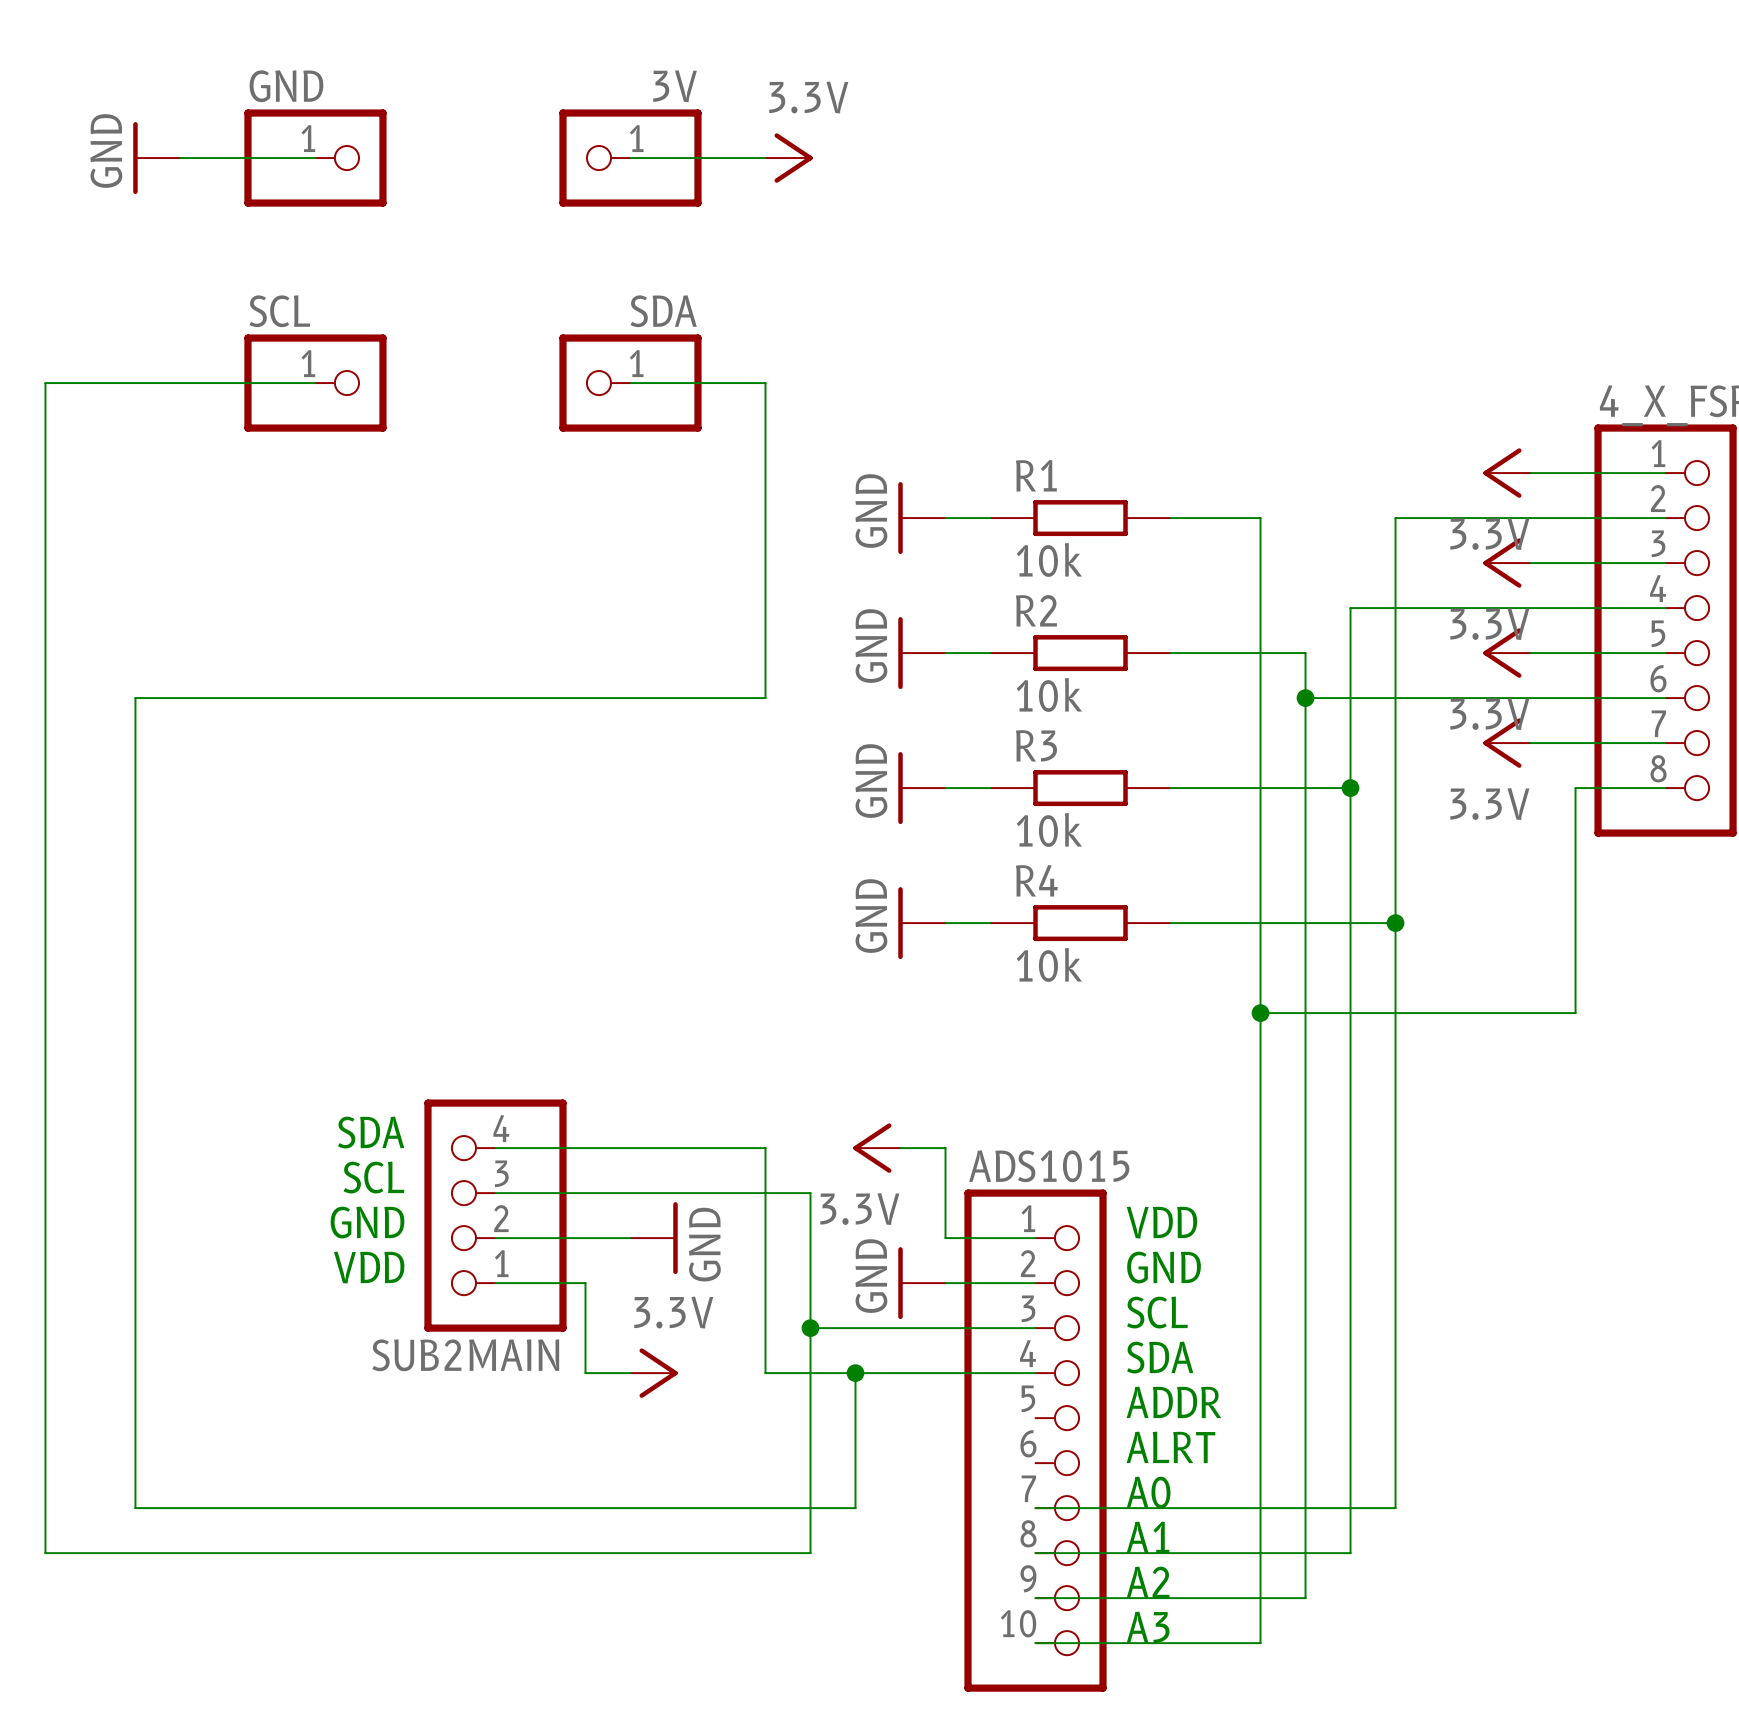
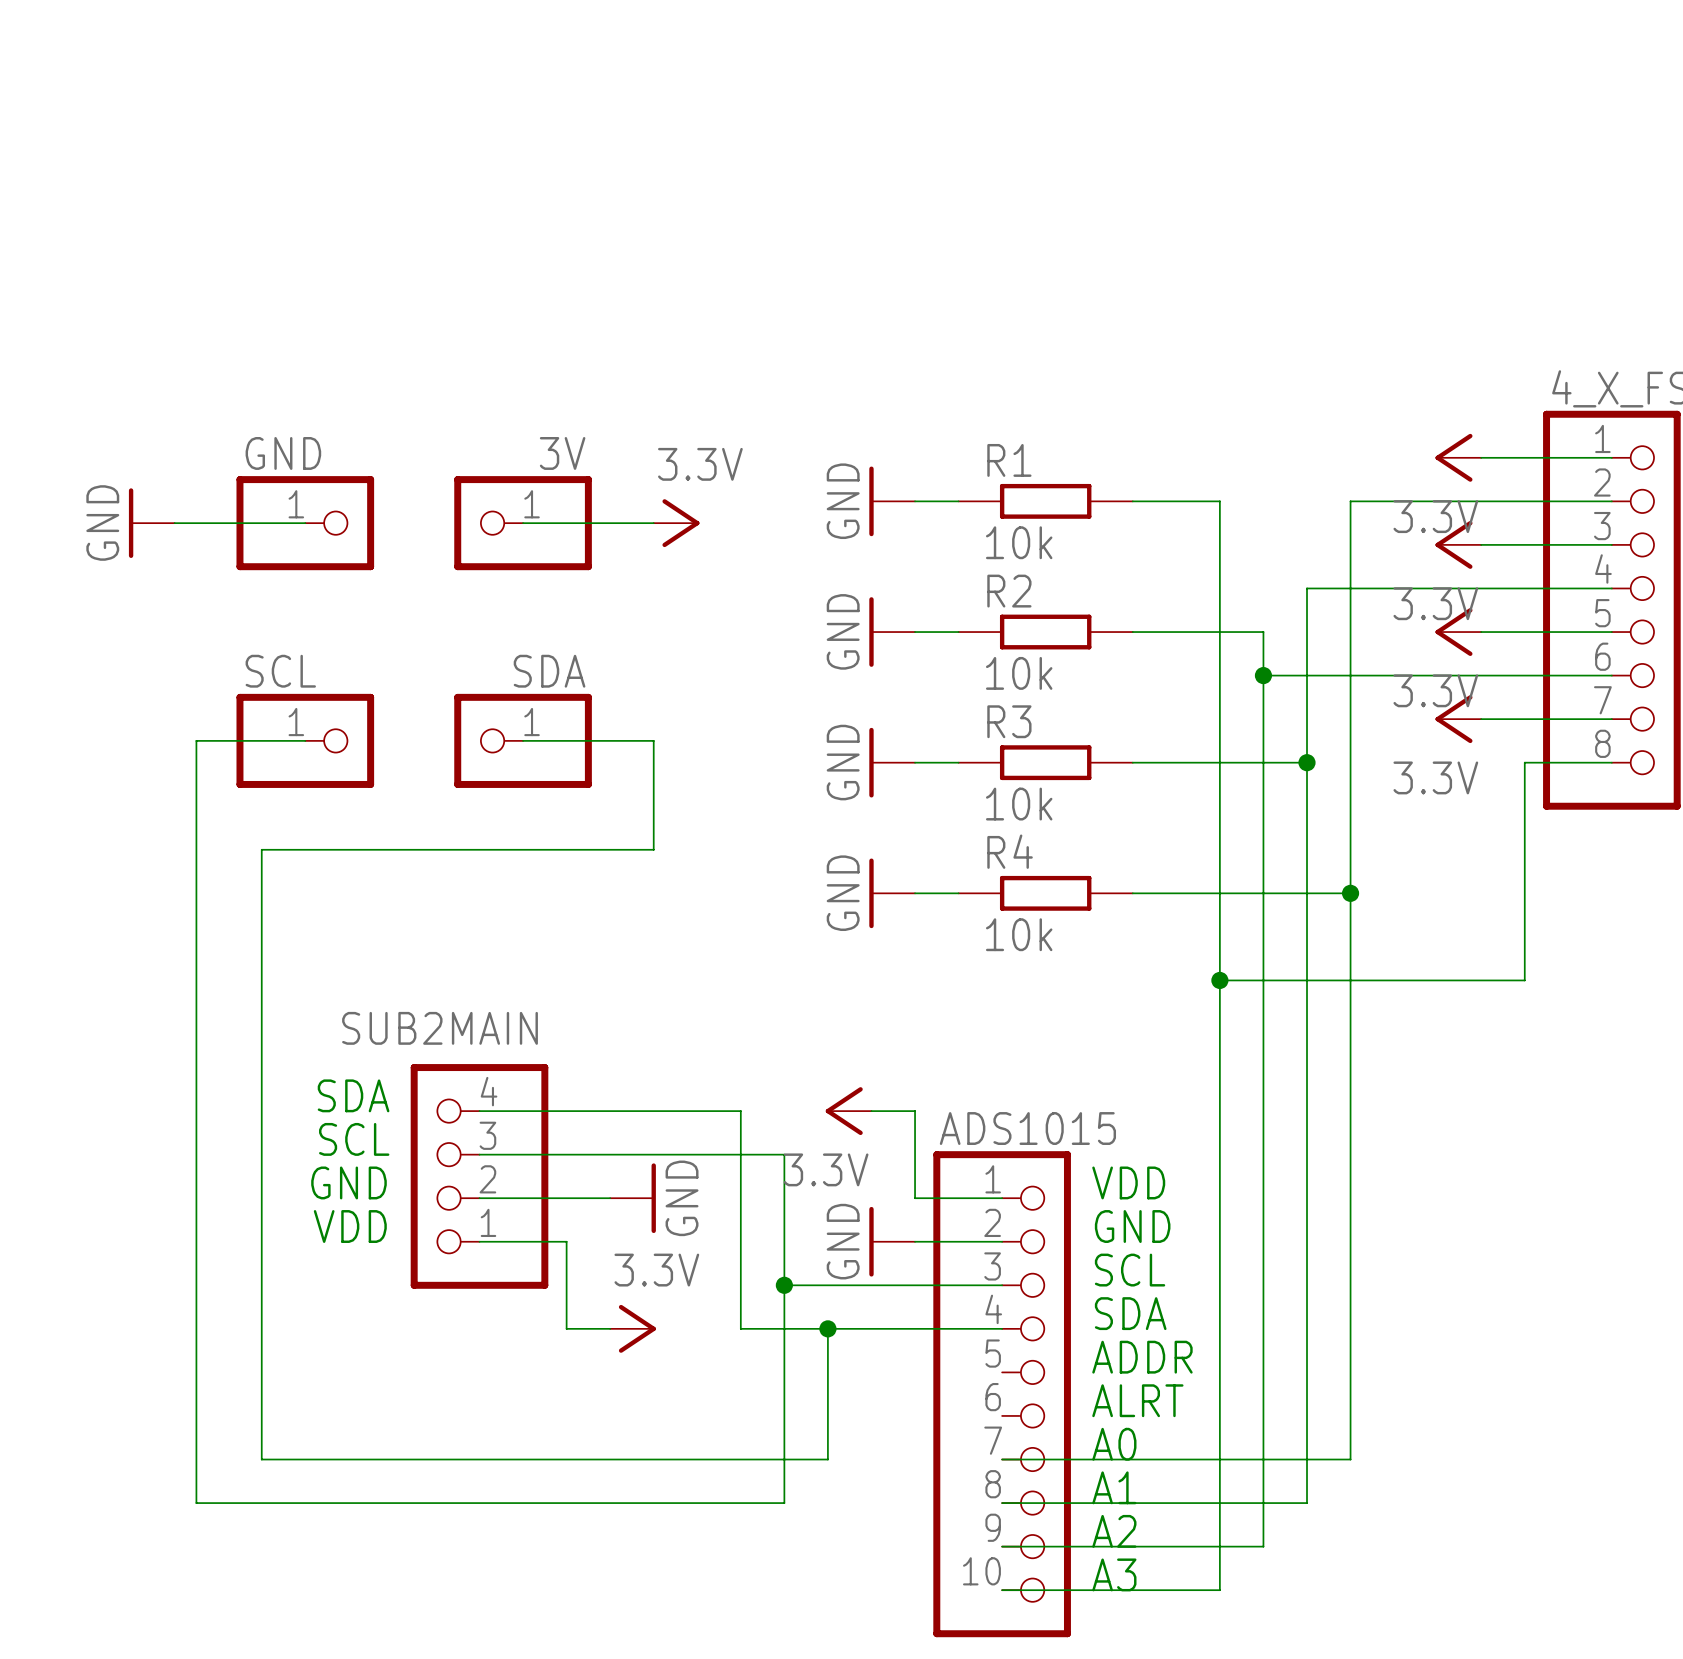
power symbol position: GND (156, 158) -> GND (151, 523)
wire: (180, 158) (315, 158) -> (174, 523) (305, 523)
GND position: (315, 158) -> (305, 523)
wire: (630, 158) (765, 158) -> (523, 523) (653, 523)
3V position: (630, 158) -> (523, 523)
power symbol position: 3.3V (789, 158) -> 3.3V (676, 523)
wire: (315, 383) (45, 383) (45, 1553) (202, 1553) -> (305, 740) (196, 740) (196, 1503)
SCL position: (315, 383) -> (305, 740)
wire: (630, 383) (765, 383) (765, 698) (135, 698) (135, 1508) (270, 1508) -> (523, 740) (653, 740) (653, 849) (261, 849) (261, 1459)
SDA position: (630, 383) -> (523, 740)
SUB2MAIN name position: SUB2MAIN (465, 1355) -> SUB2MAIN (440, 1028)

